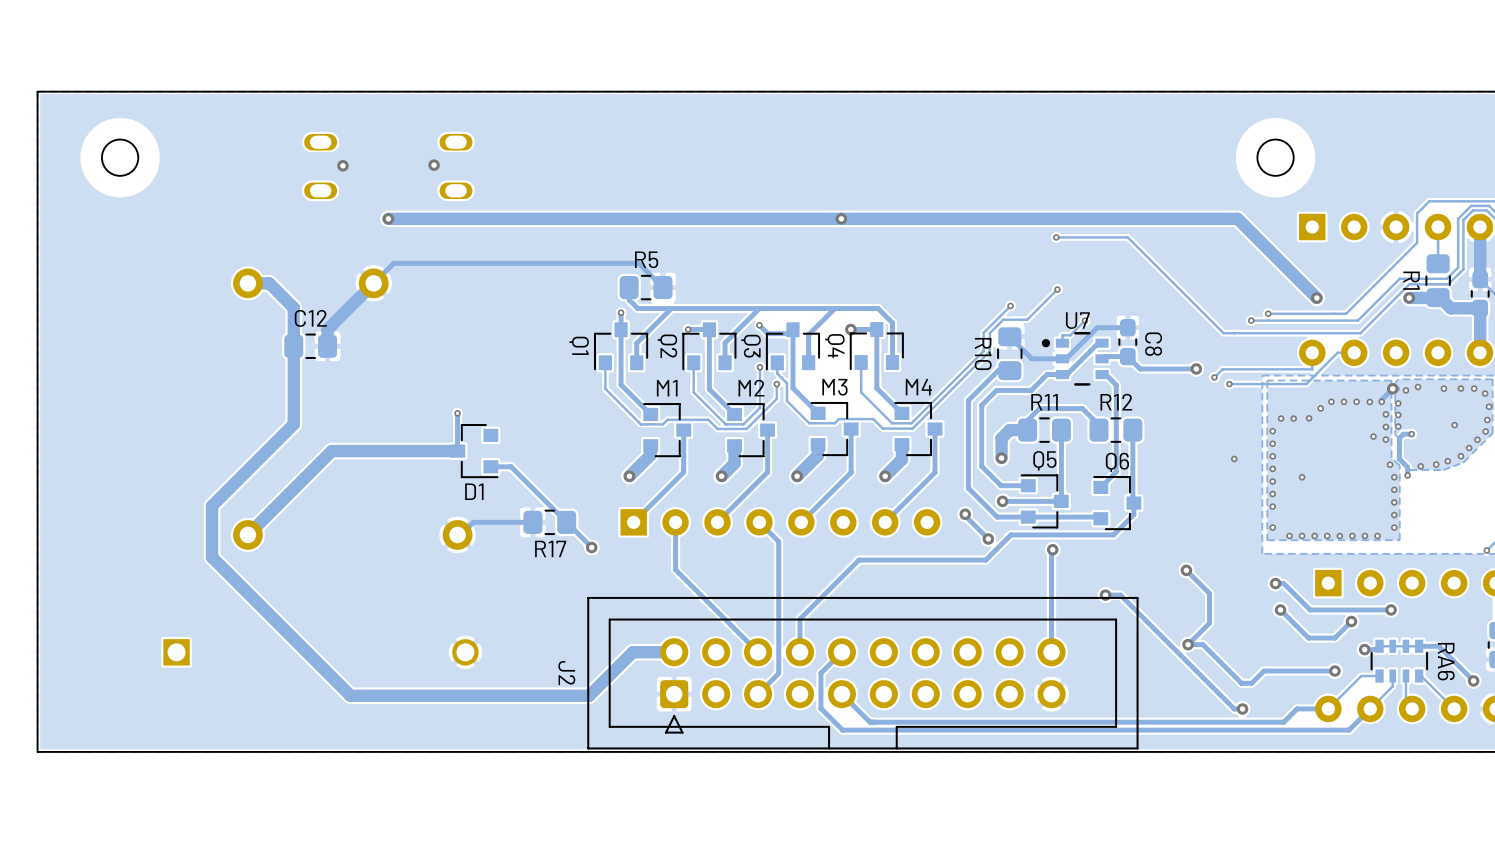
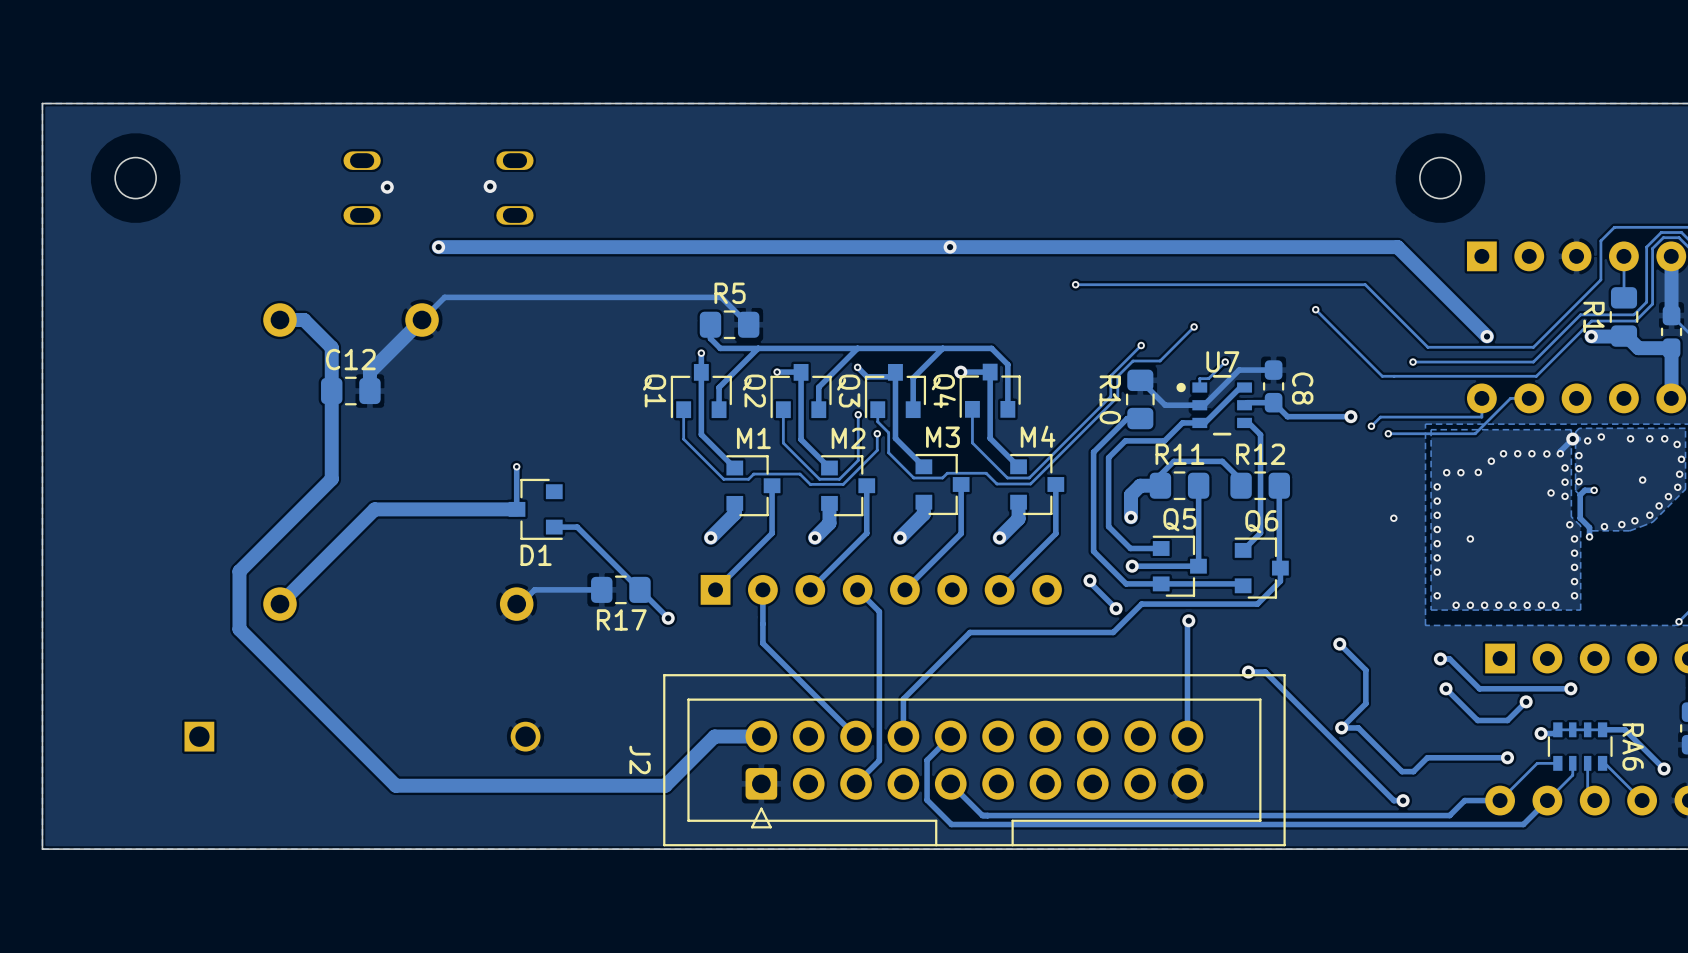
track: (1429, 201) (1417, 213) (1417, 242) (1346, 313) (1268, 313) -> (1614, 227) (1600, 240) (1600, 279) (1533, 347) (1427, 347) (1365, 284) (1075, 284)
track: (1056, 237) (1127, 237) (1224, 333) -> (1315, 309) (1382, 376)
via: (1056, 237) -> none
via: none -> (1075, 284)
via: none -> (1315, 309)
via: (1268, 313) -> none

